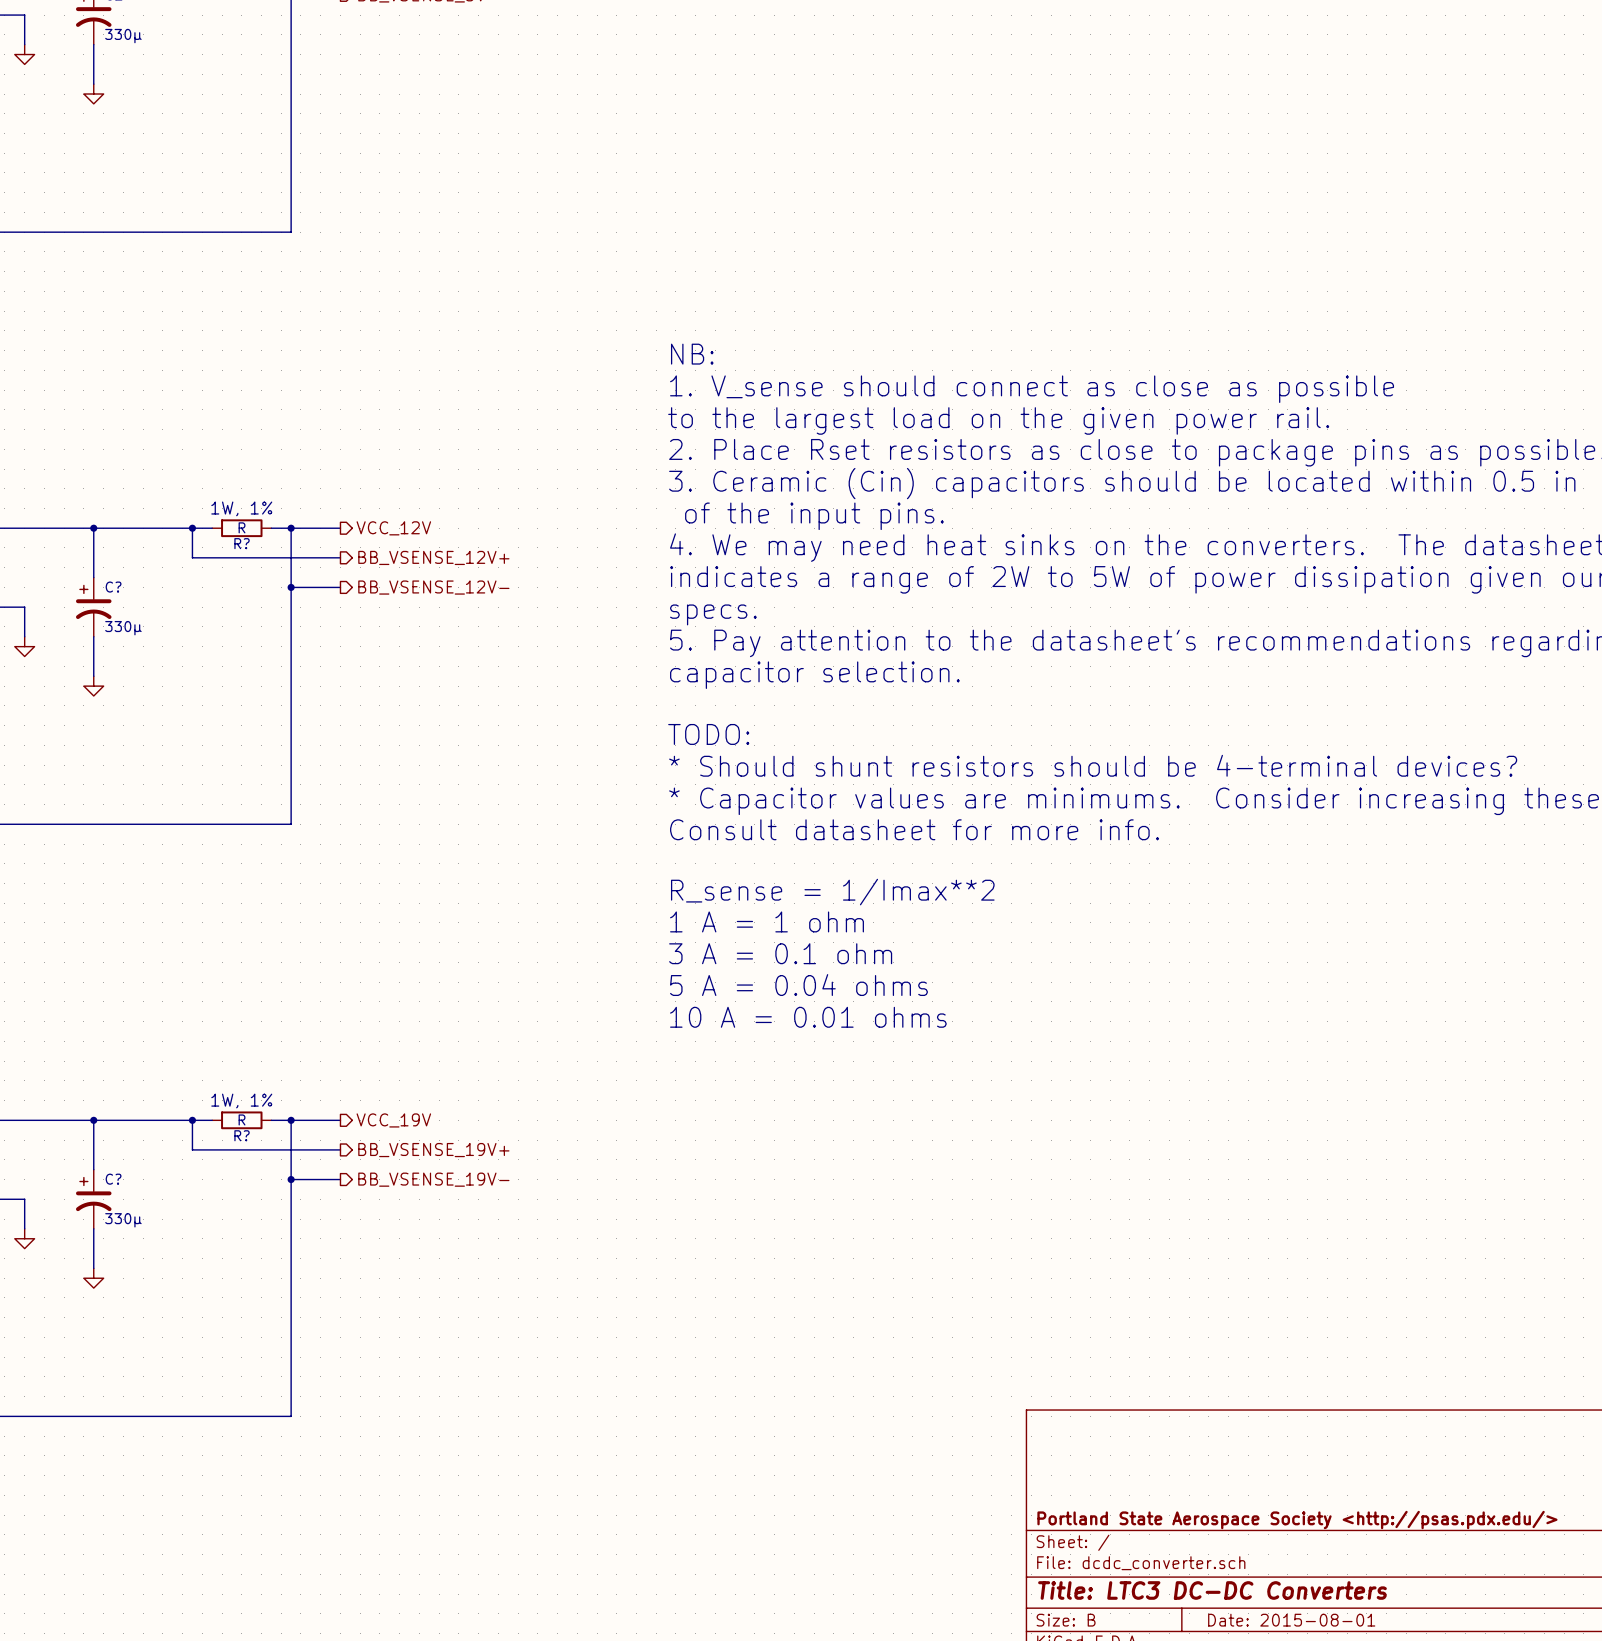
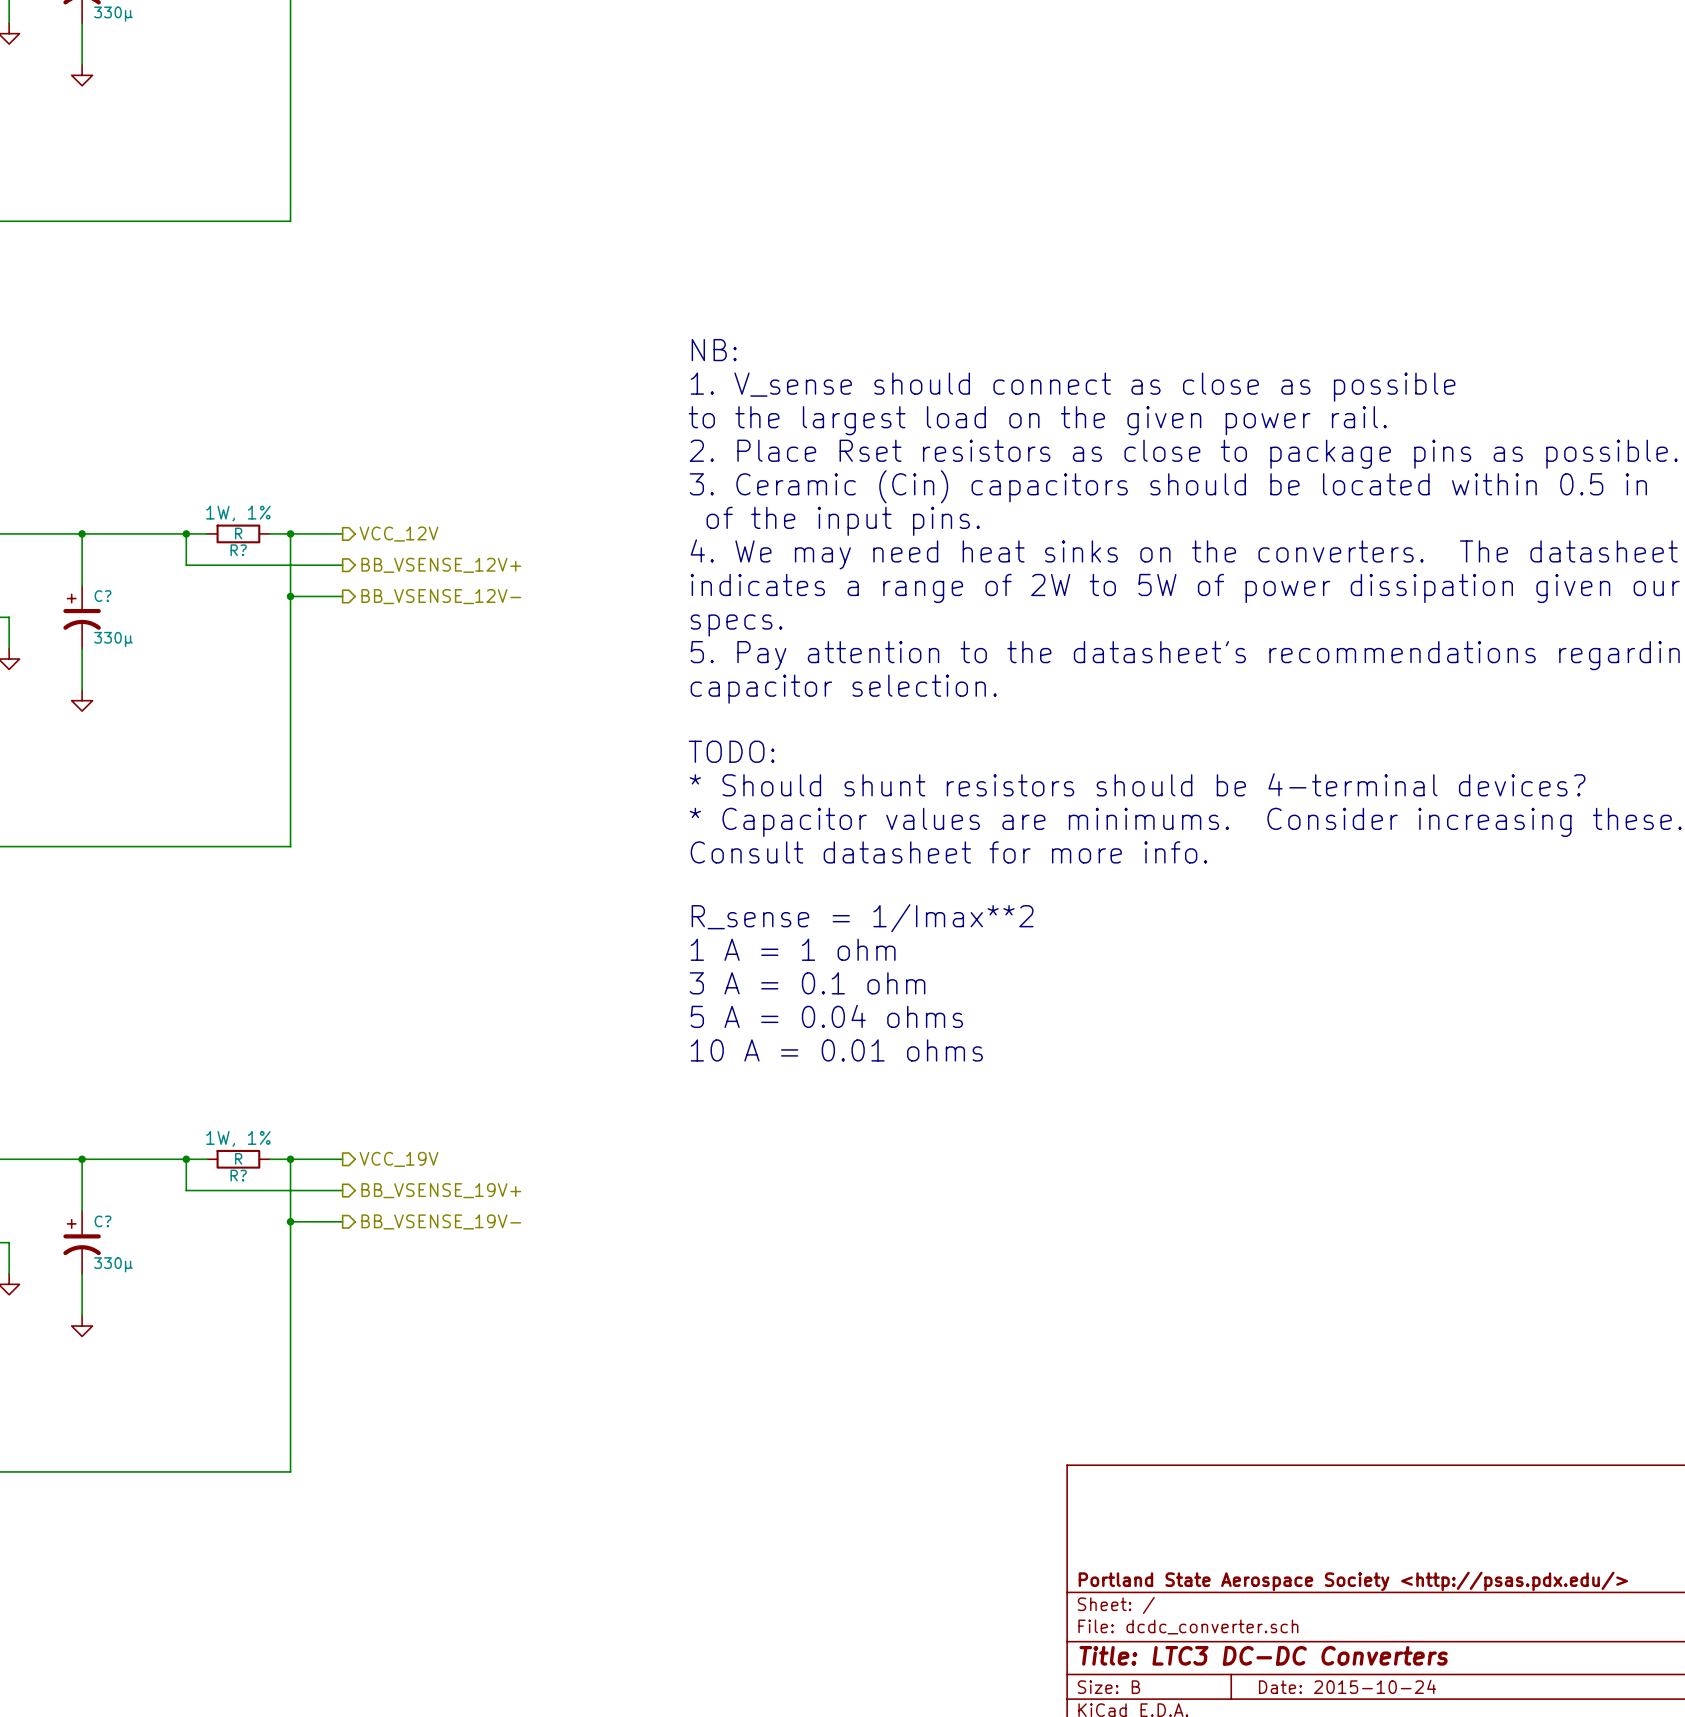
title block: Date: 2015-08-01 (1291, 1620) -> Date: 2015-10-24 (1347, 1686)

